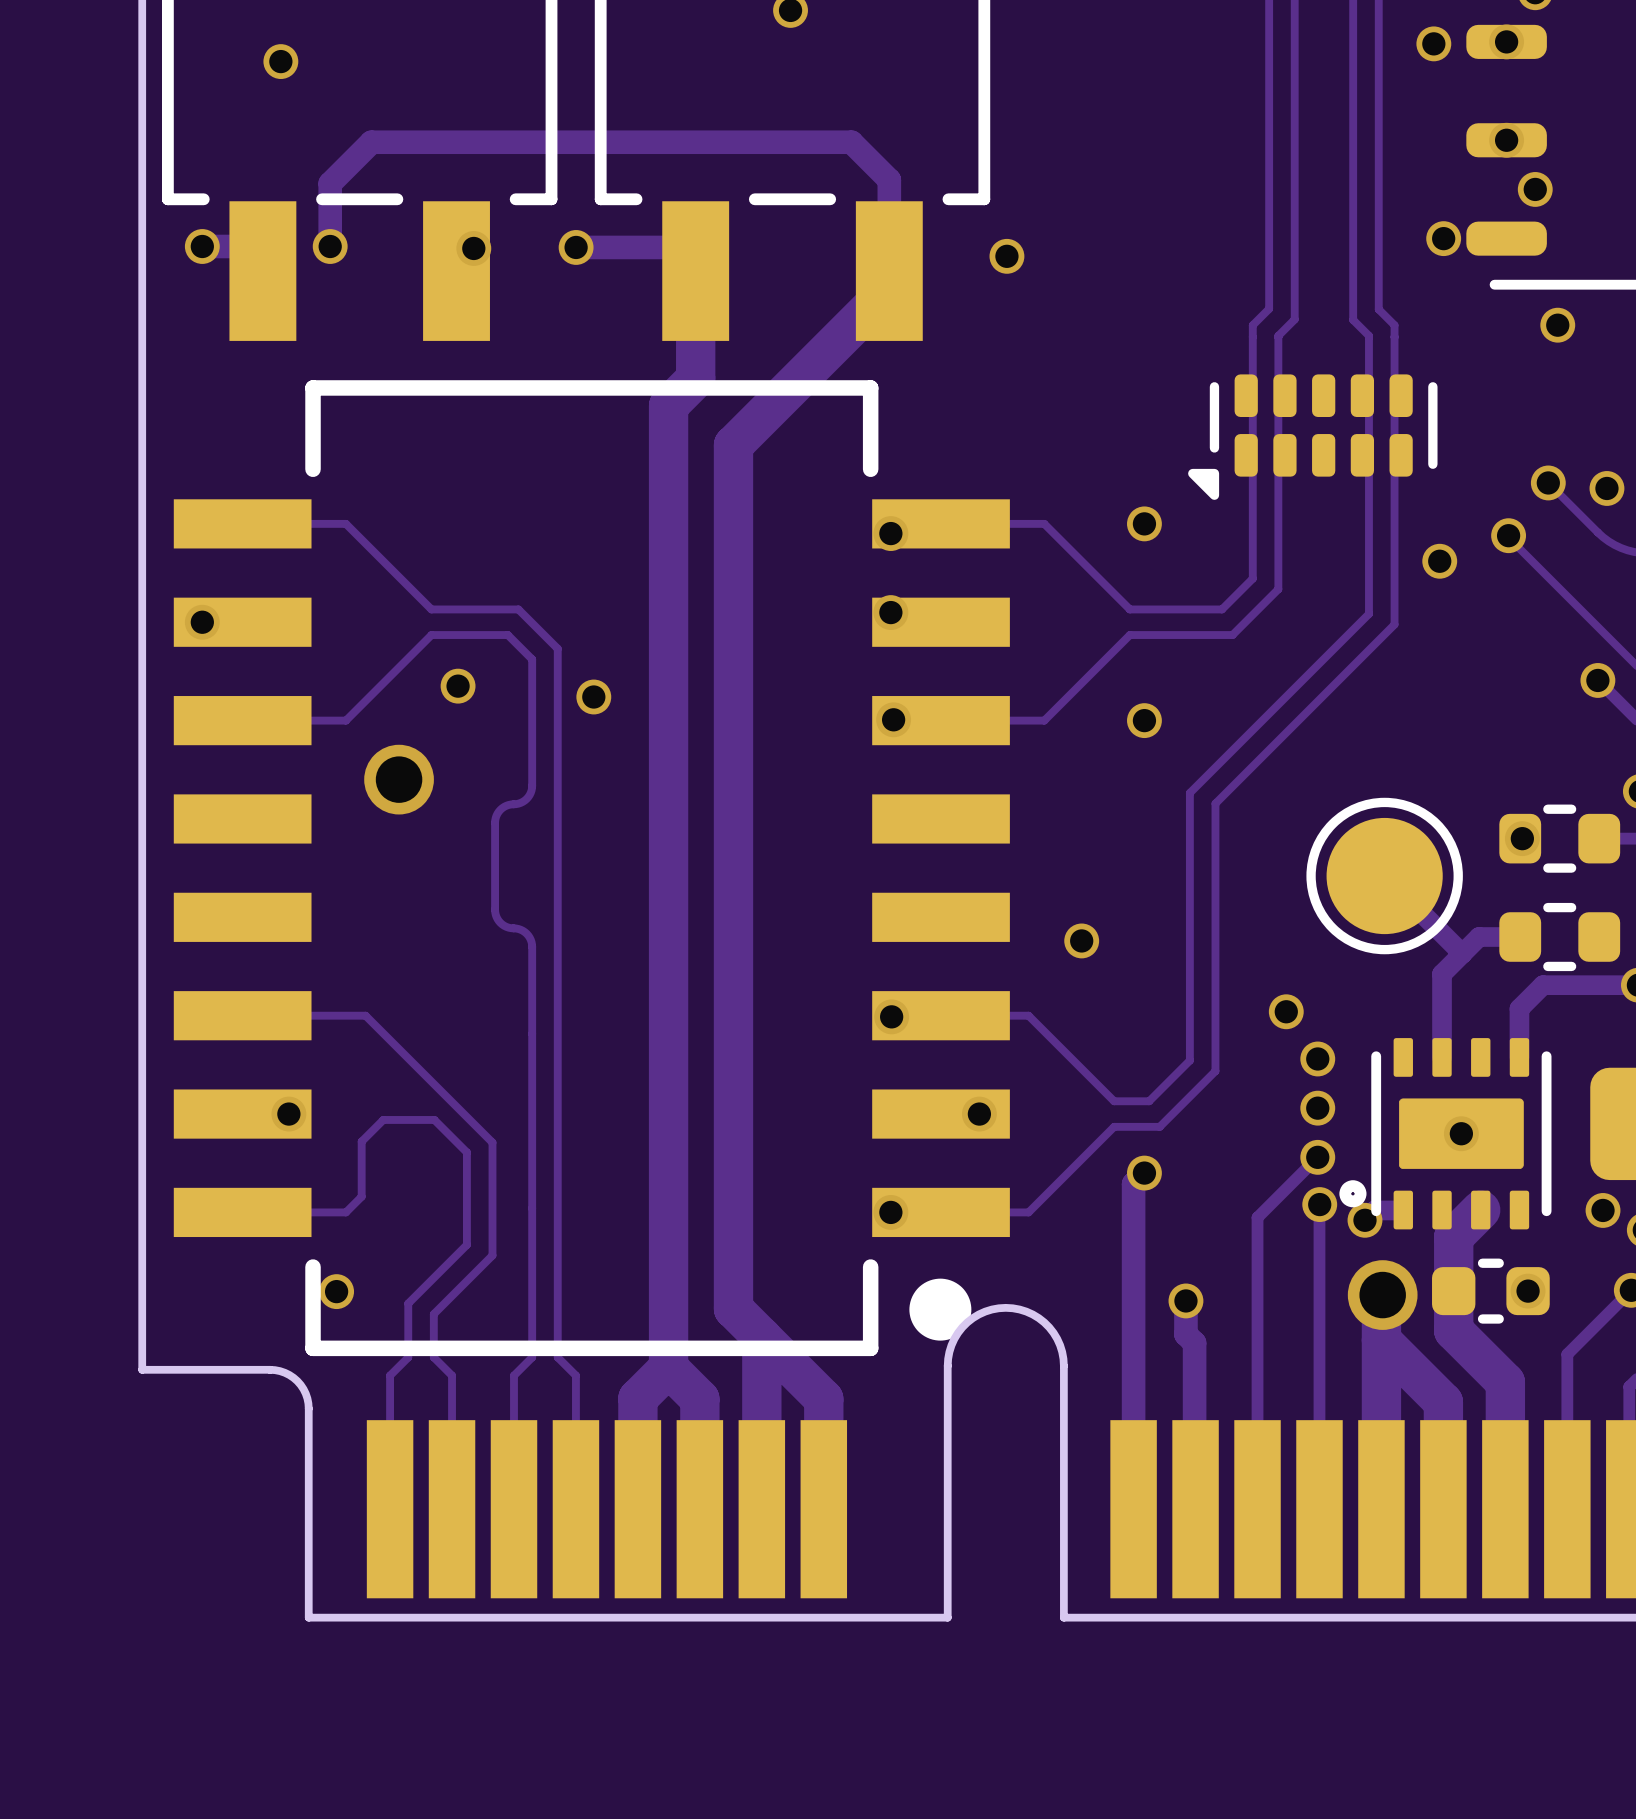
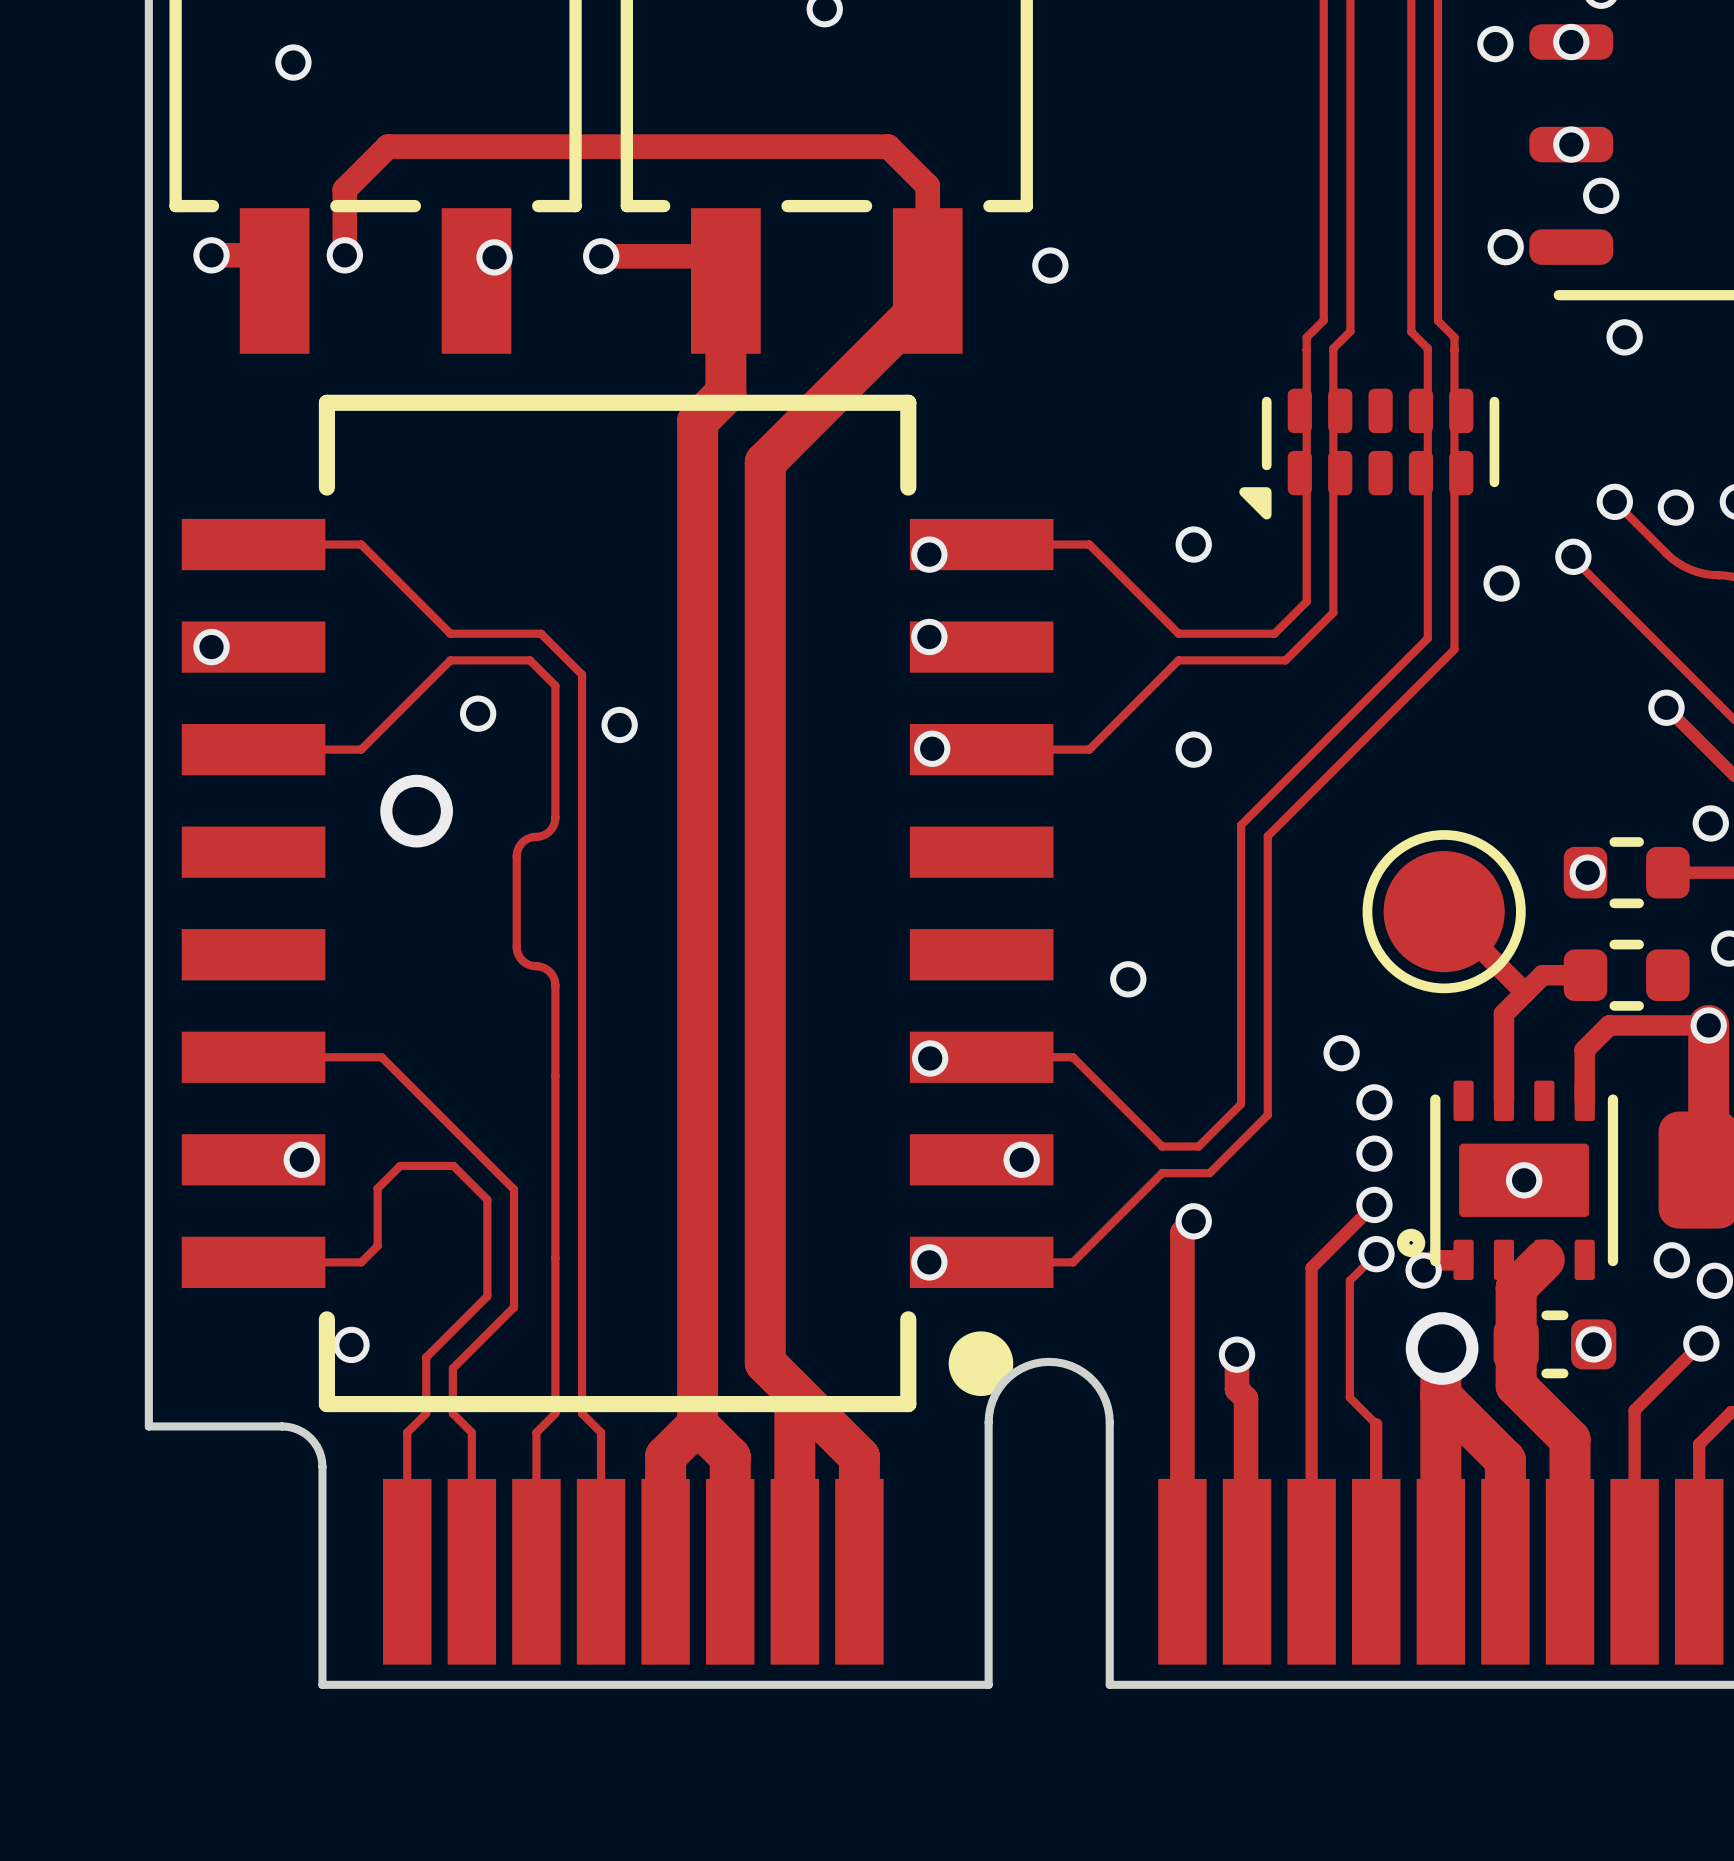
track: (1319, 1204) (1319, 1367) -> (1374, 1256) (1349, 1280) (1349, 1397) (1376, 1424)

